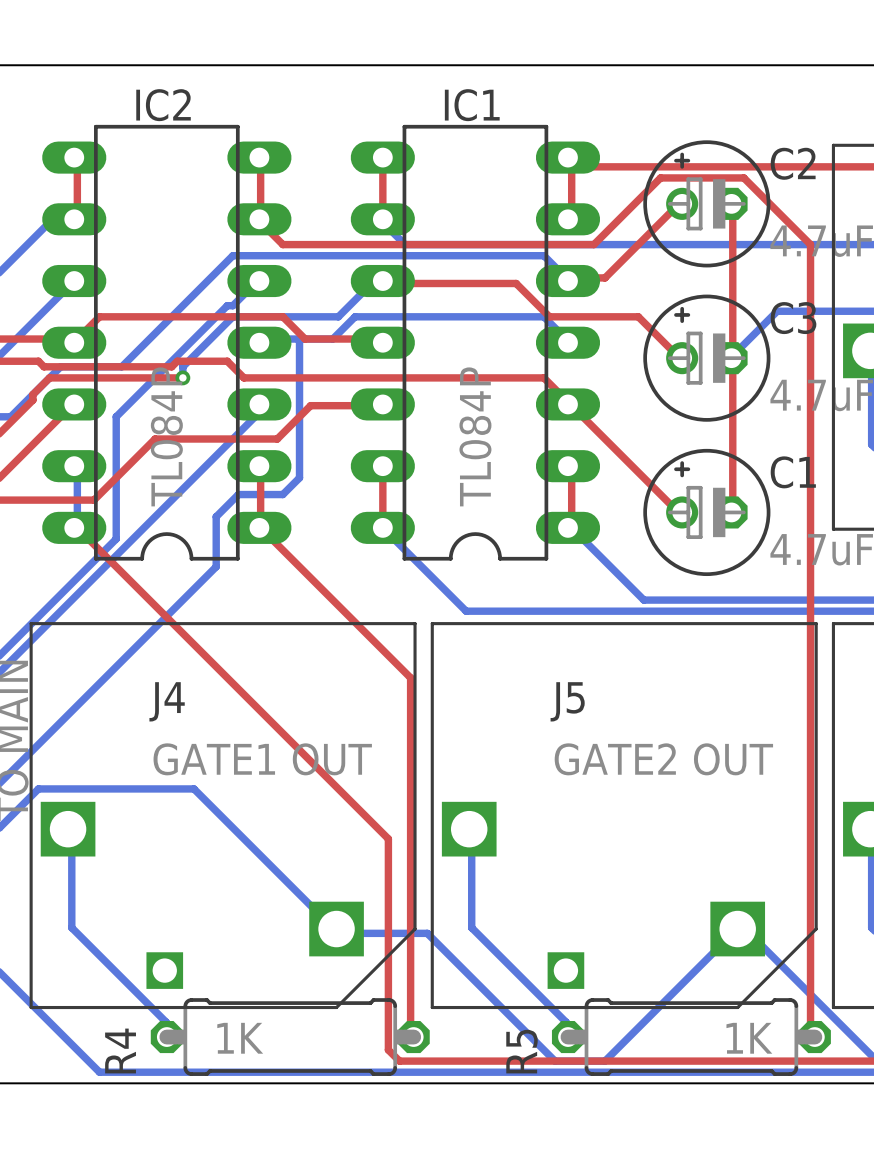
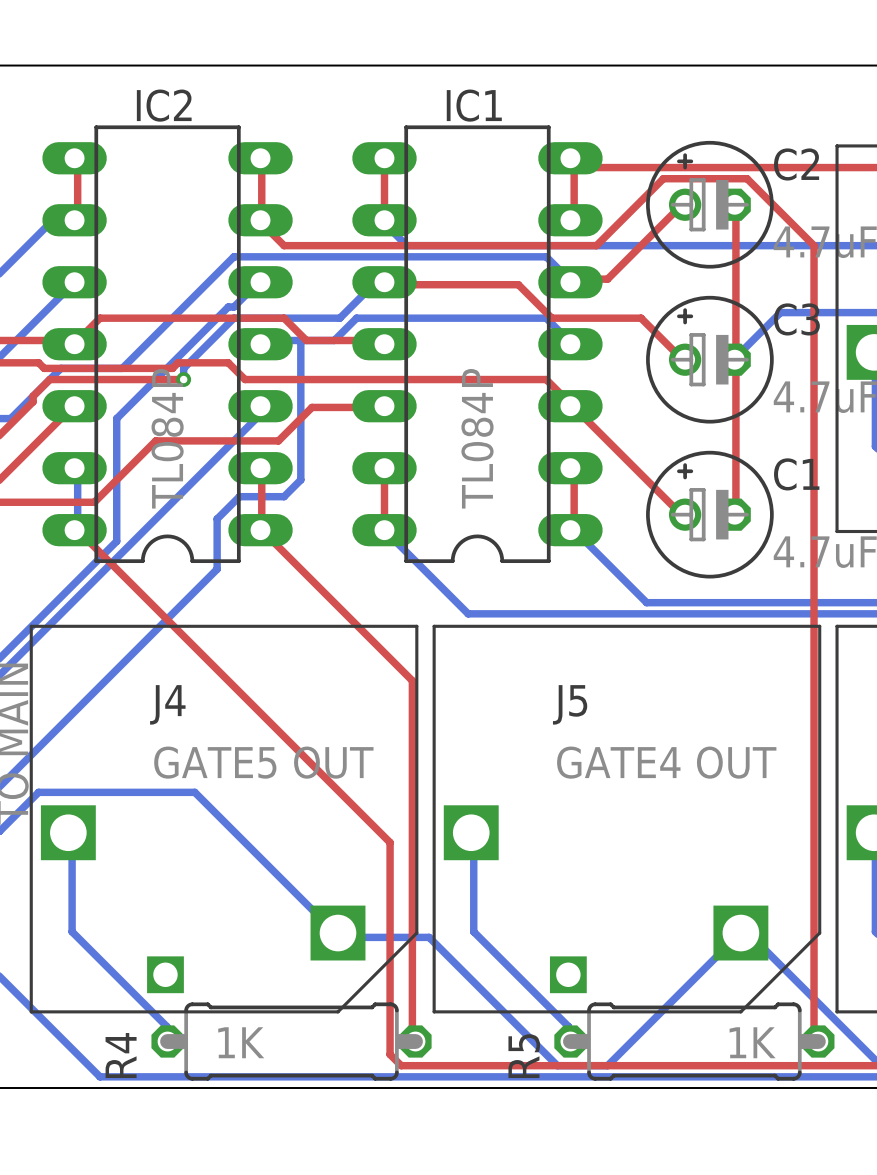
J4 value: GATE1 OUT (262, 759) -> GATE5 OUT (263, 762)
J5 value: GATE2 OUT (663, 759) -> GATE4 OUT (666, 762)

